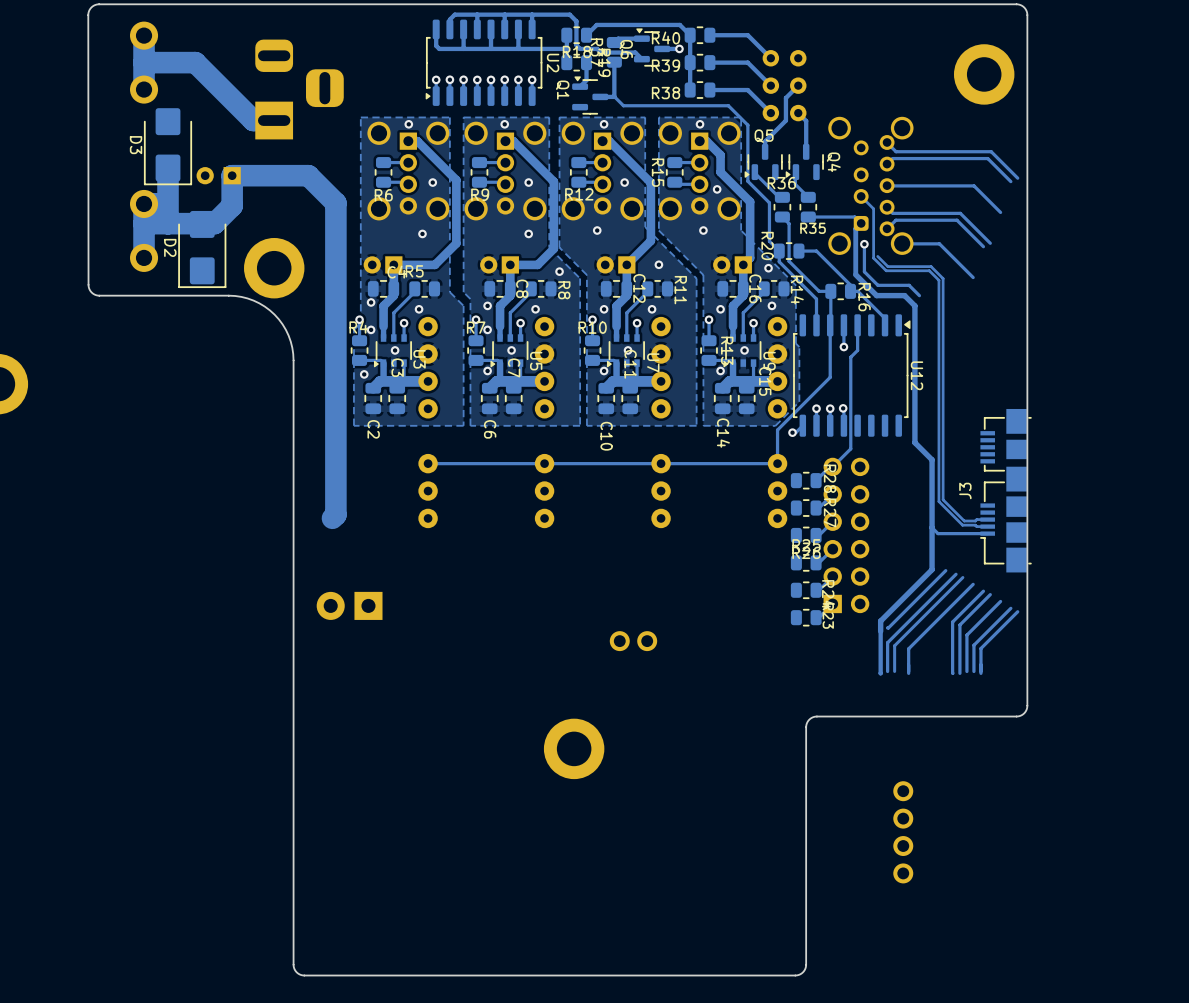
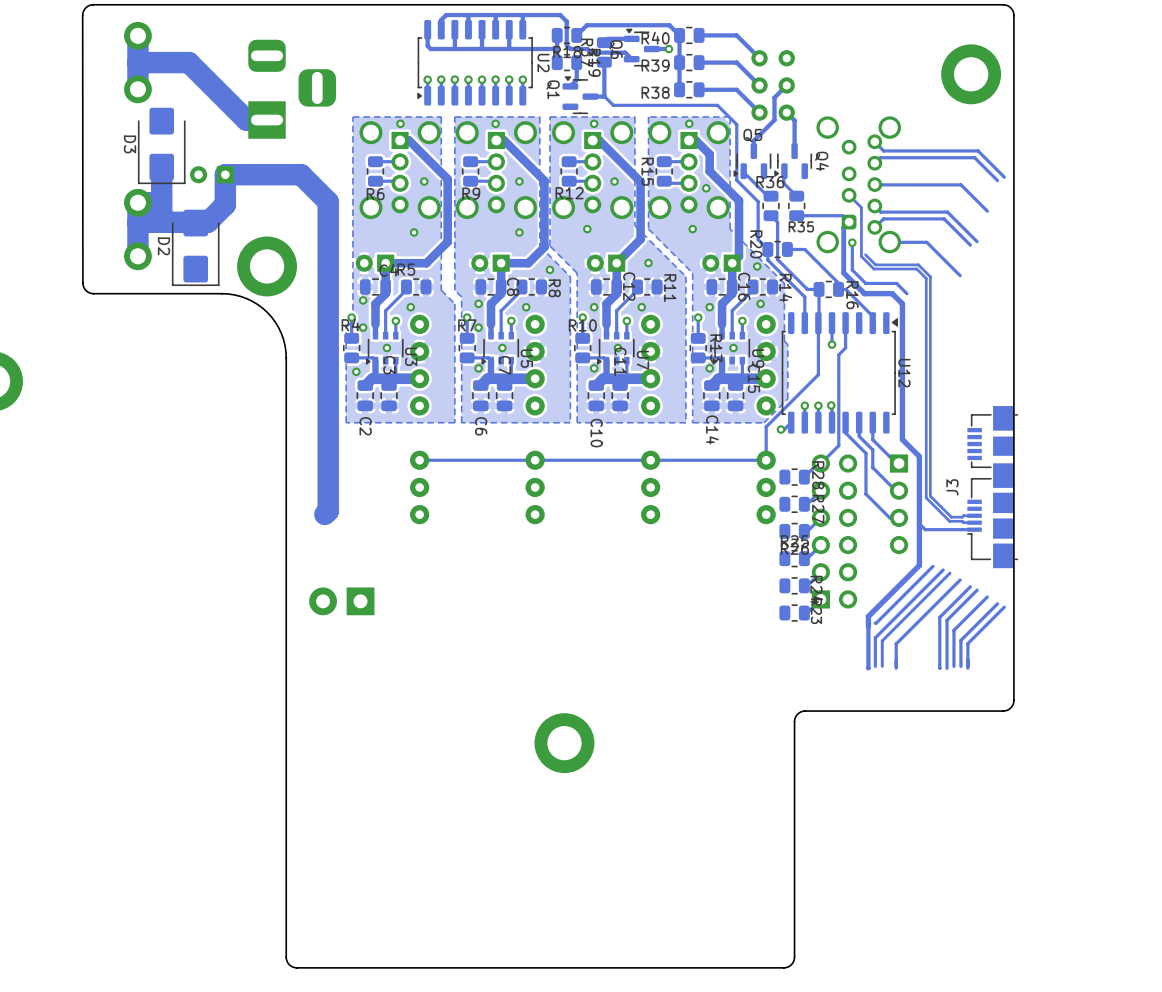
track: none -> (845, 422) (845, 432) (865, 453) (865, 494) (889, 517) (899, 517)
track: none -> (859, 422) (859, 436) (872, 449) (872, 467) (895, 490) (899, 490)
track: none -> (872, 422) (872, 439) (896, 463) (899, 463)
part: none -> (899, 504)
part: (633, 641) -> none
part: (903, 832) -> none

